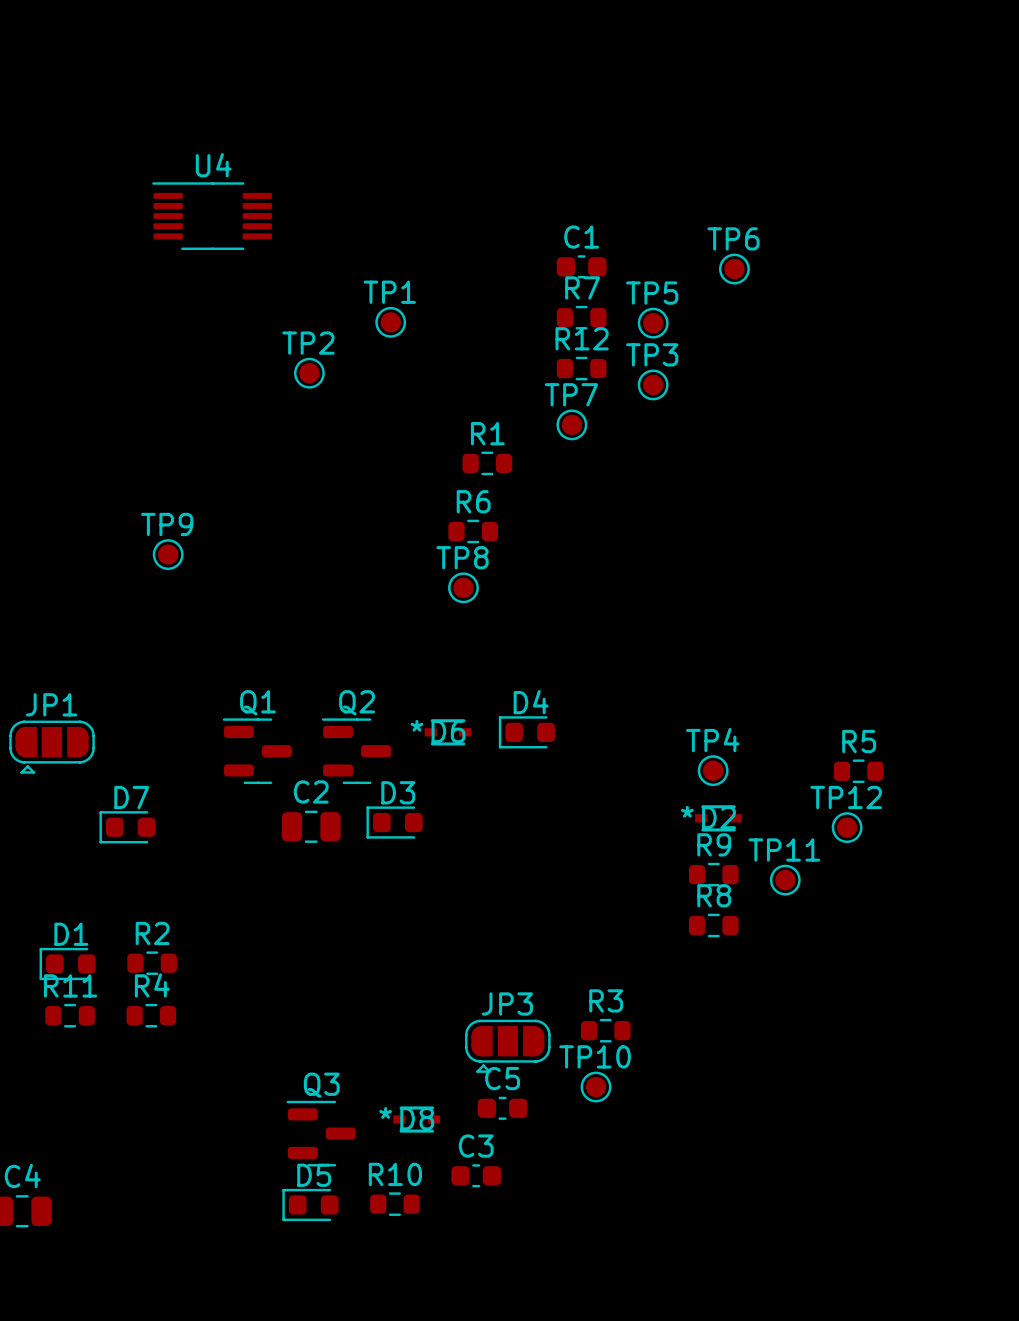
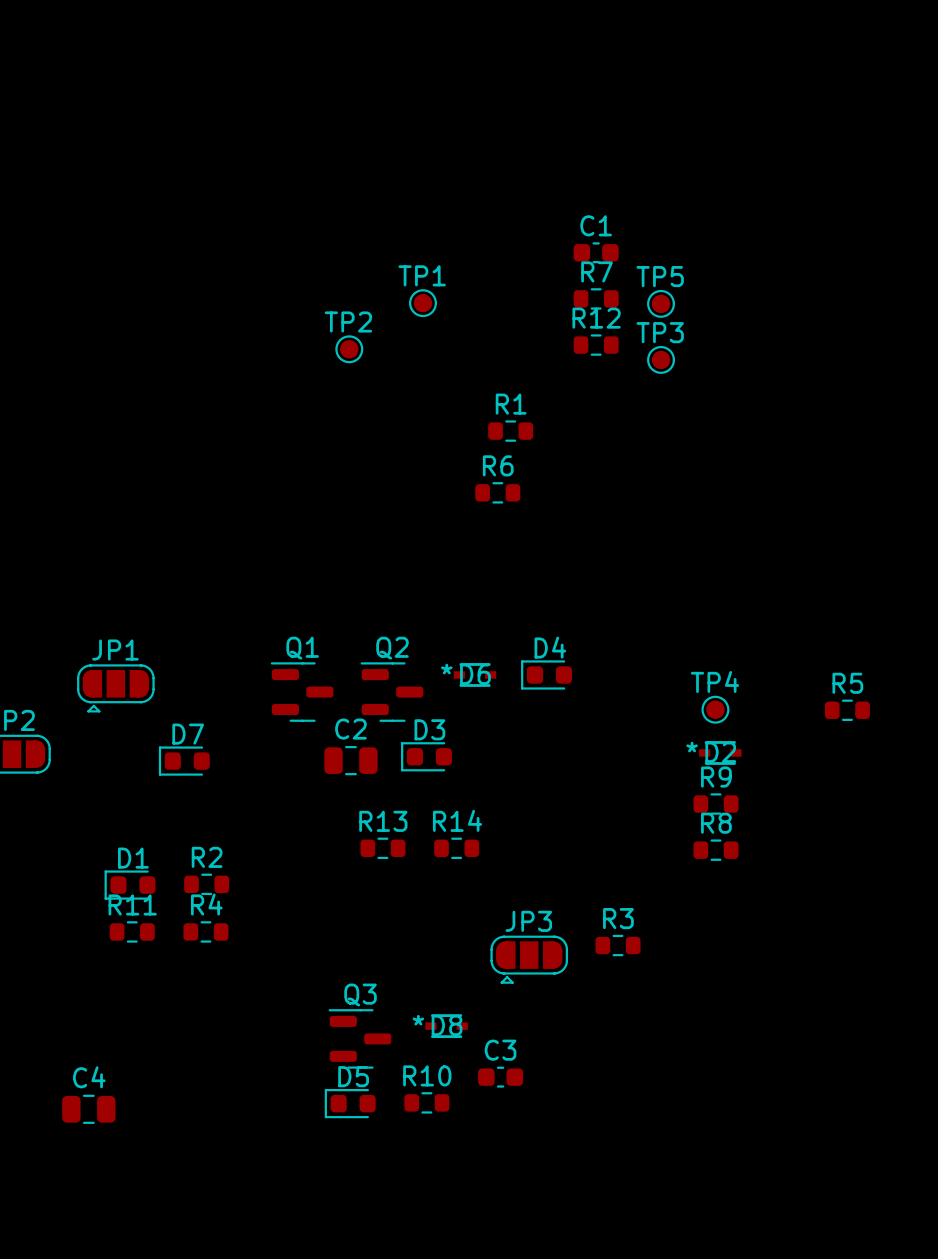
U4: (212, 216) -> none
TP6: (734, 269) -> none
TP7: (571, 424) -> none
TP9: (168, 554) -> none
TP8: (463, 587) -> none
TP12: (847, 827) -> none
TP11: (785, 880) -> none
R13: none -> (382, 848)
R14: none -> (456, 848)
TP10: (596, 1087) -> none
C5: (502, 1108) -> none

